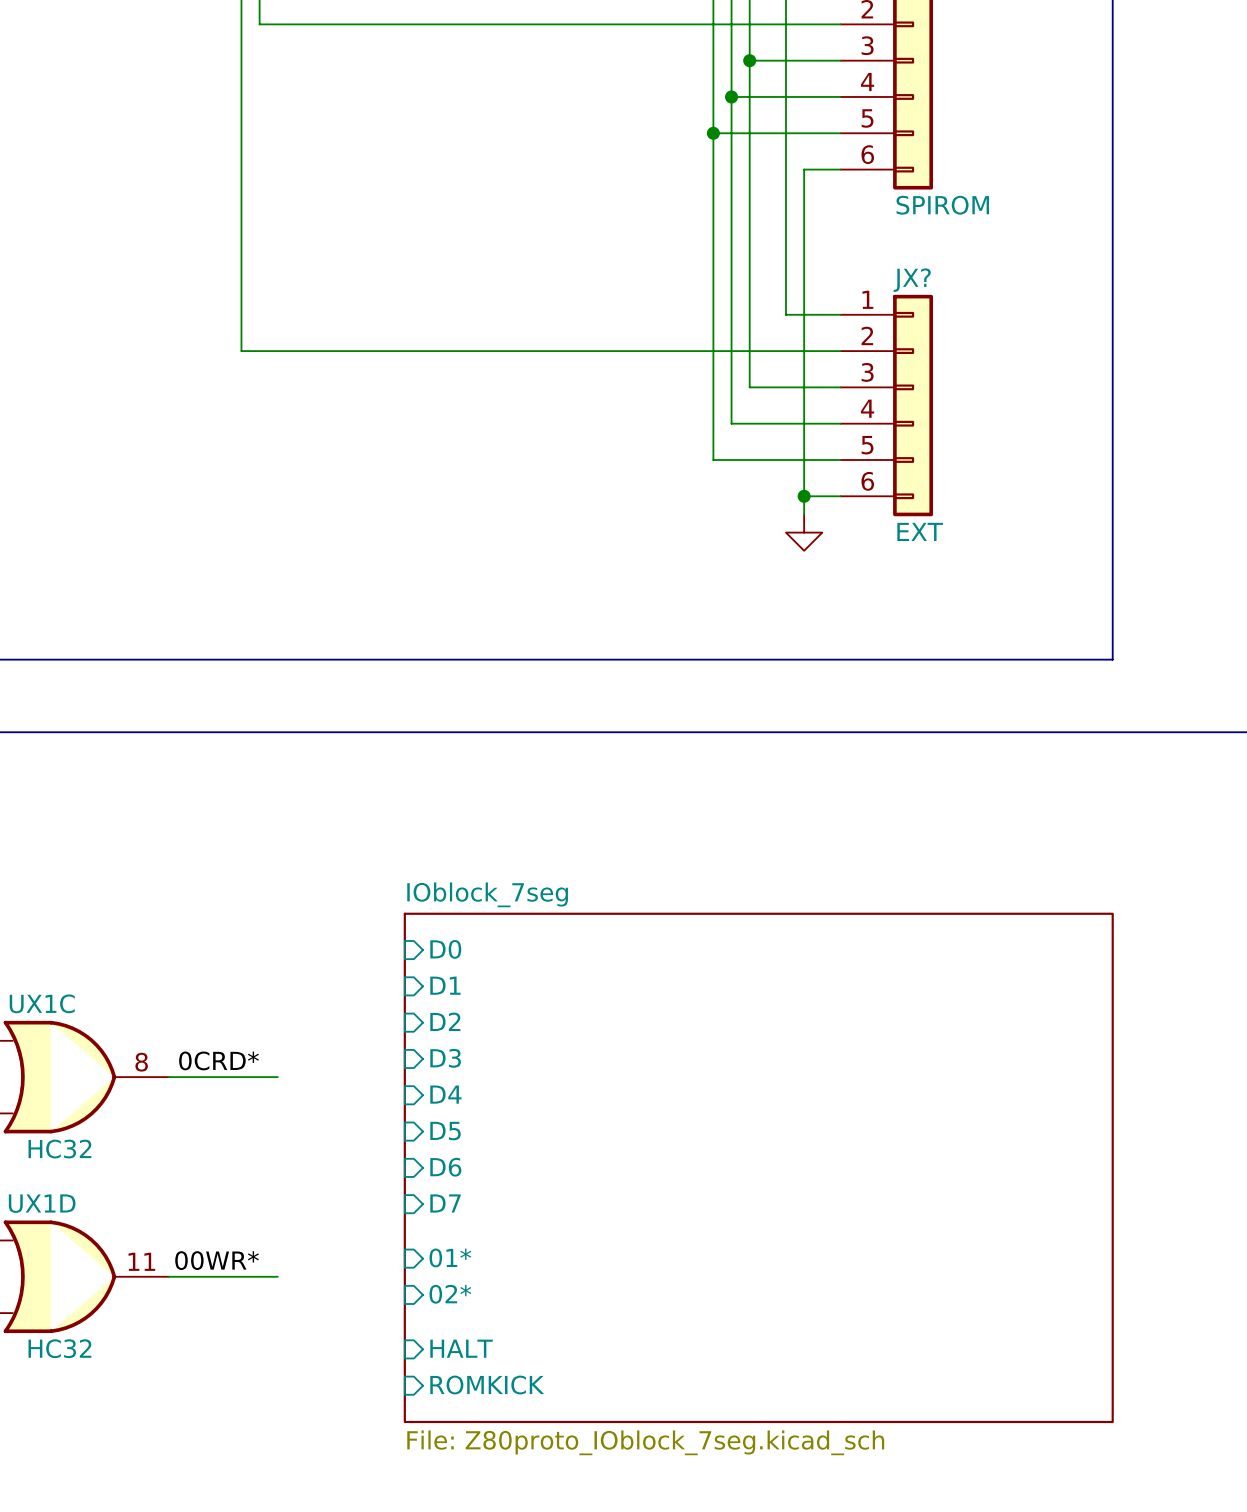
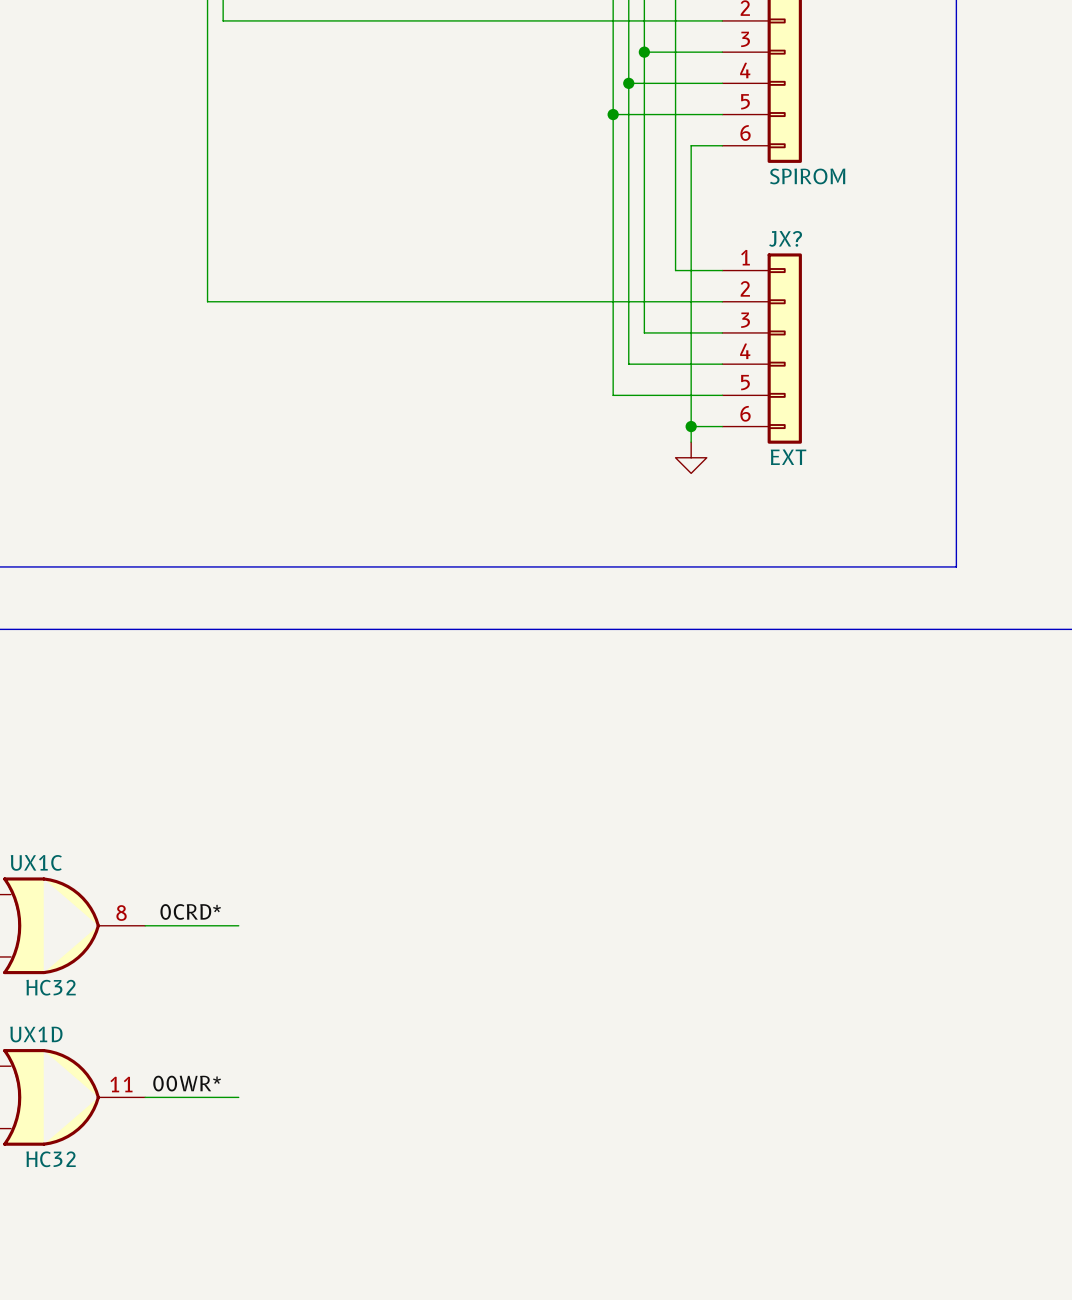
sheet pin: D0 (445, 949) -> none
sheet pin: D1 (445, 985) -> none
sheet pin: D2 (445, 1021) -> none
sheet pin: D3 (445, 1058) -> none
sheet pin: D4 (445, 1094) -> none
sheet pin: D5 (445, 1131) -> none
sheet pin: D6 (445, 1167) -> none
sheet IOblock_7seg: File: Z80proto_IOblock_7seg.kicad_sch (758, 1167) -> none
sheet pin: D7 (445, 1203) -> none
sheet pin: 01* (450, 1257) -> none
sheet pin: 02* (450, 1294) -> none
sheet pin: HALT (461, 1348) -> none
sheet pin: ROMKICK (487, 1385) -> none

